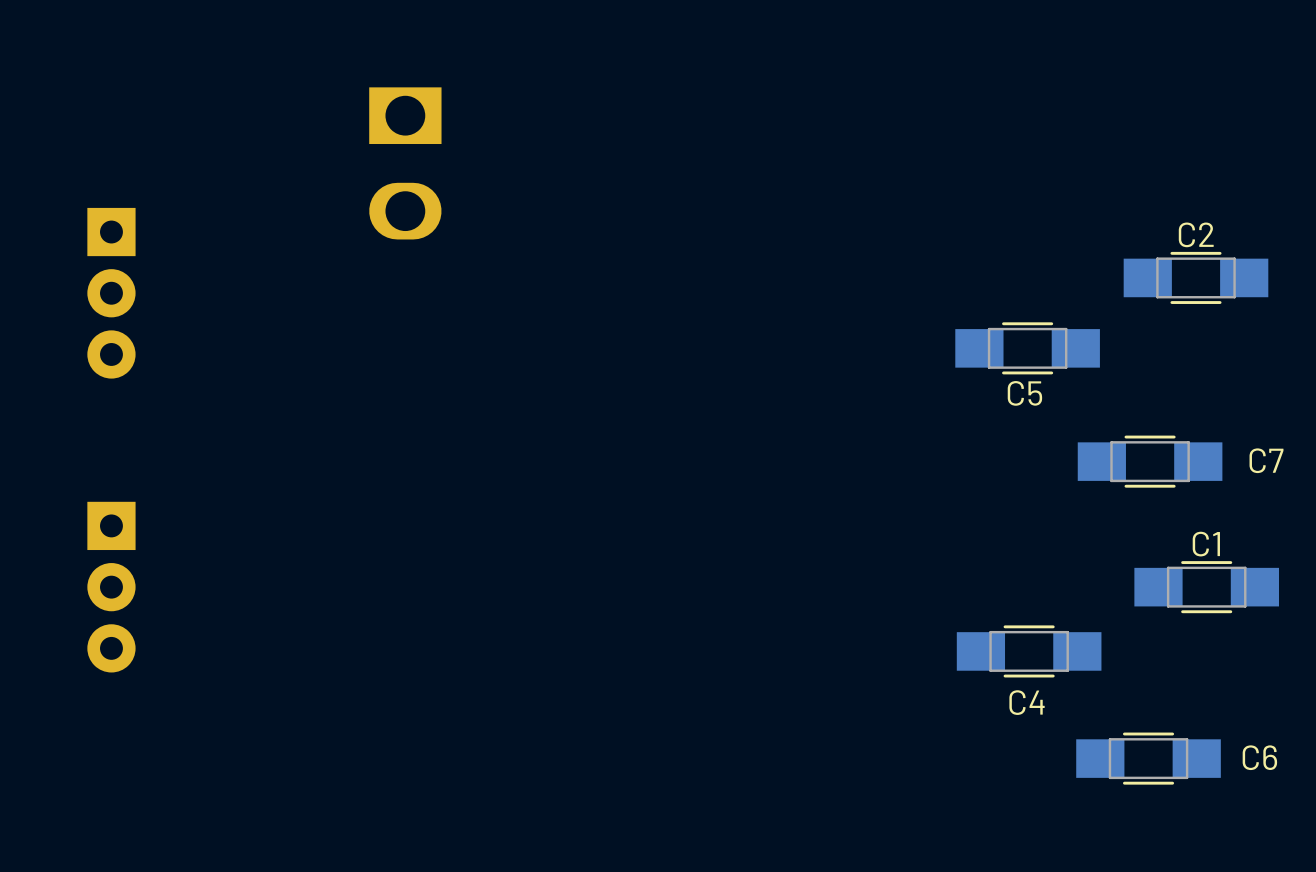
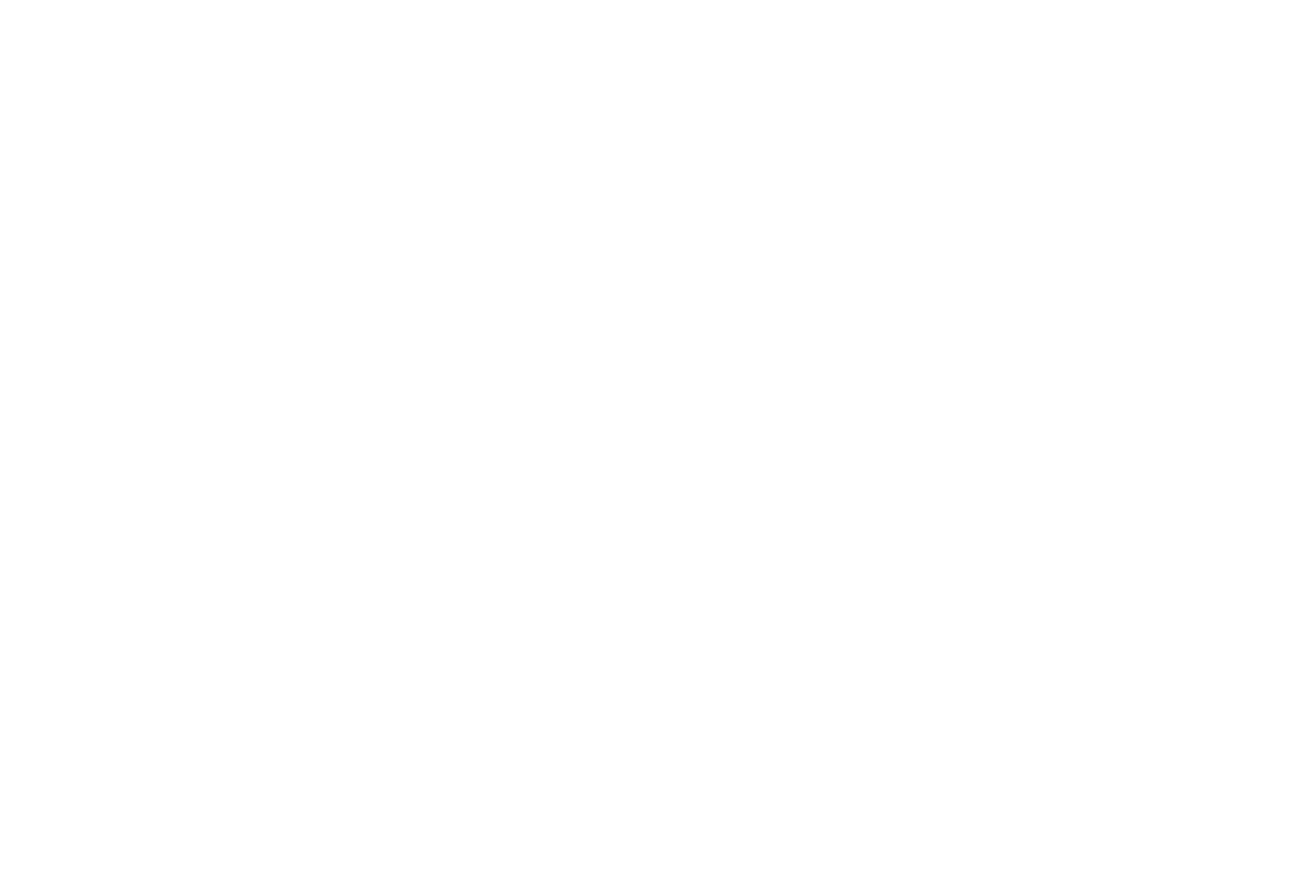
part: (405, 163) -> none
C2: (1195, 277) -> none
part: (111, 293) -> none
C5: (1027, 348) -> none
C7: (1150, 461) -> none
part: (111, 587) -> none
C1: (1206, 587) -> none
C4: (1029, 651) -> none
C6: (1148, 758) -> none

